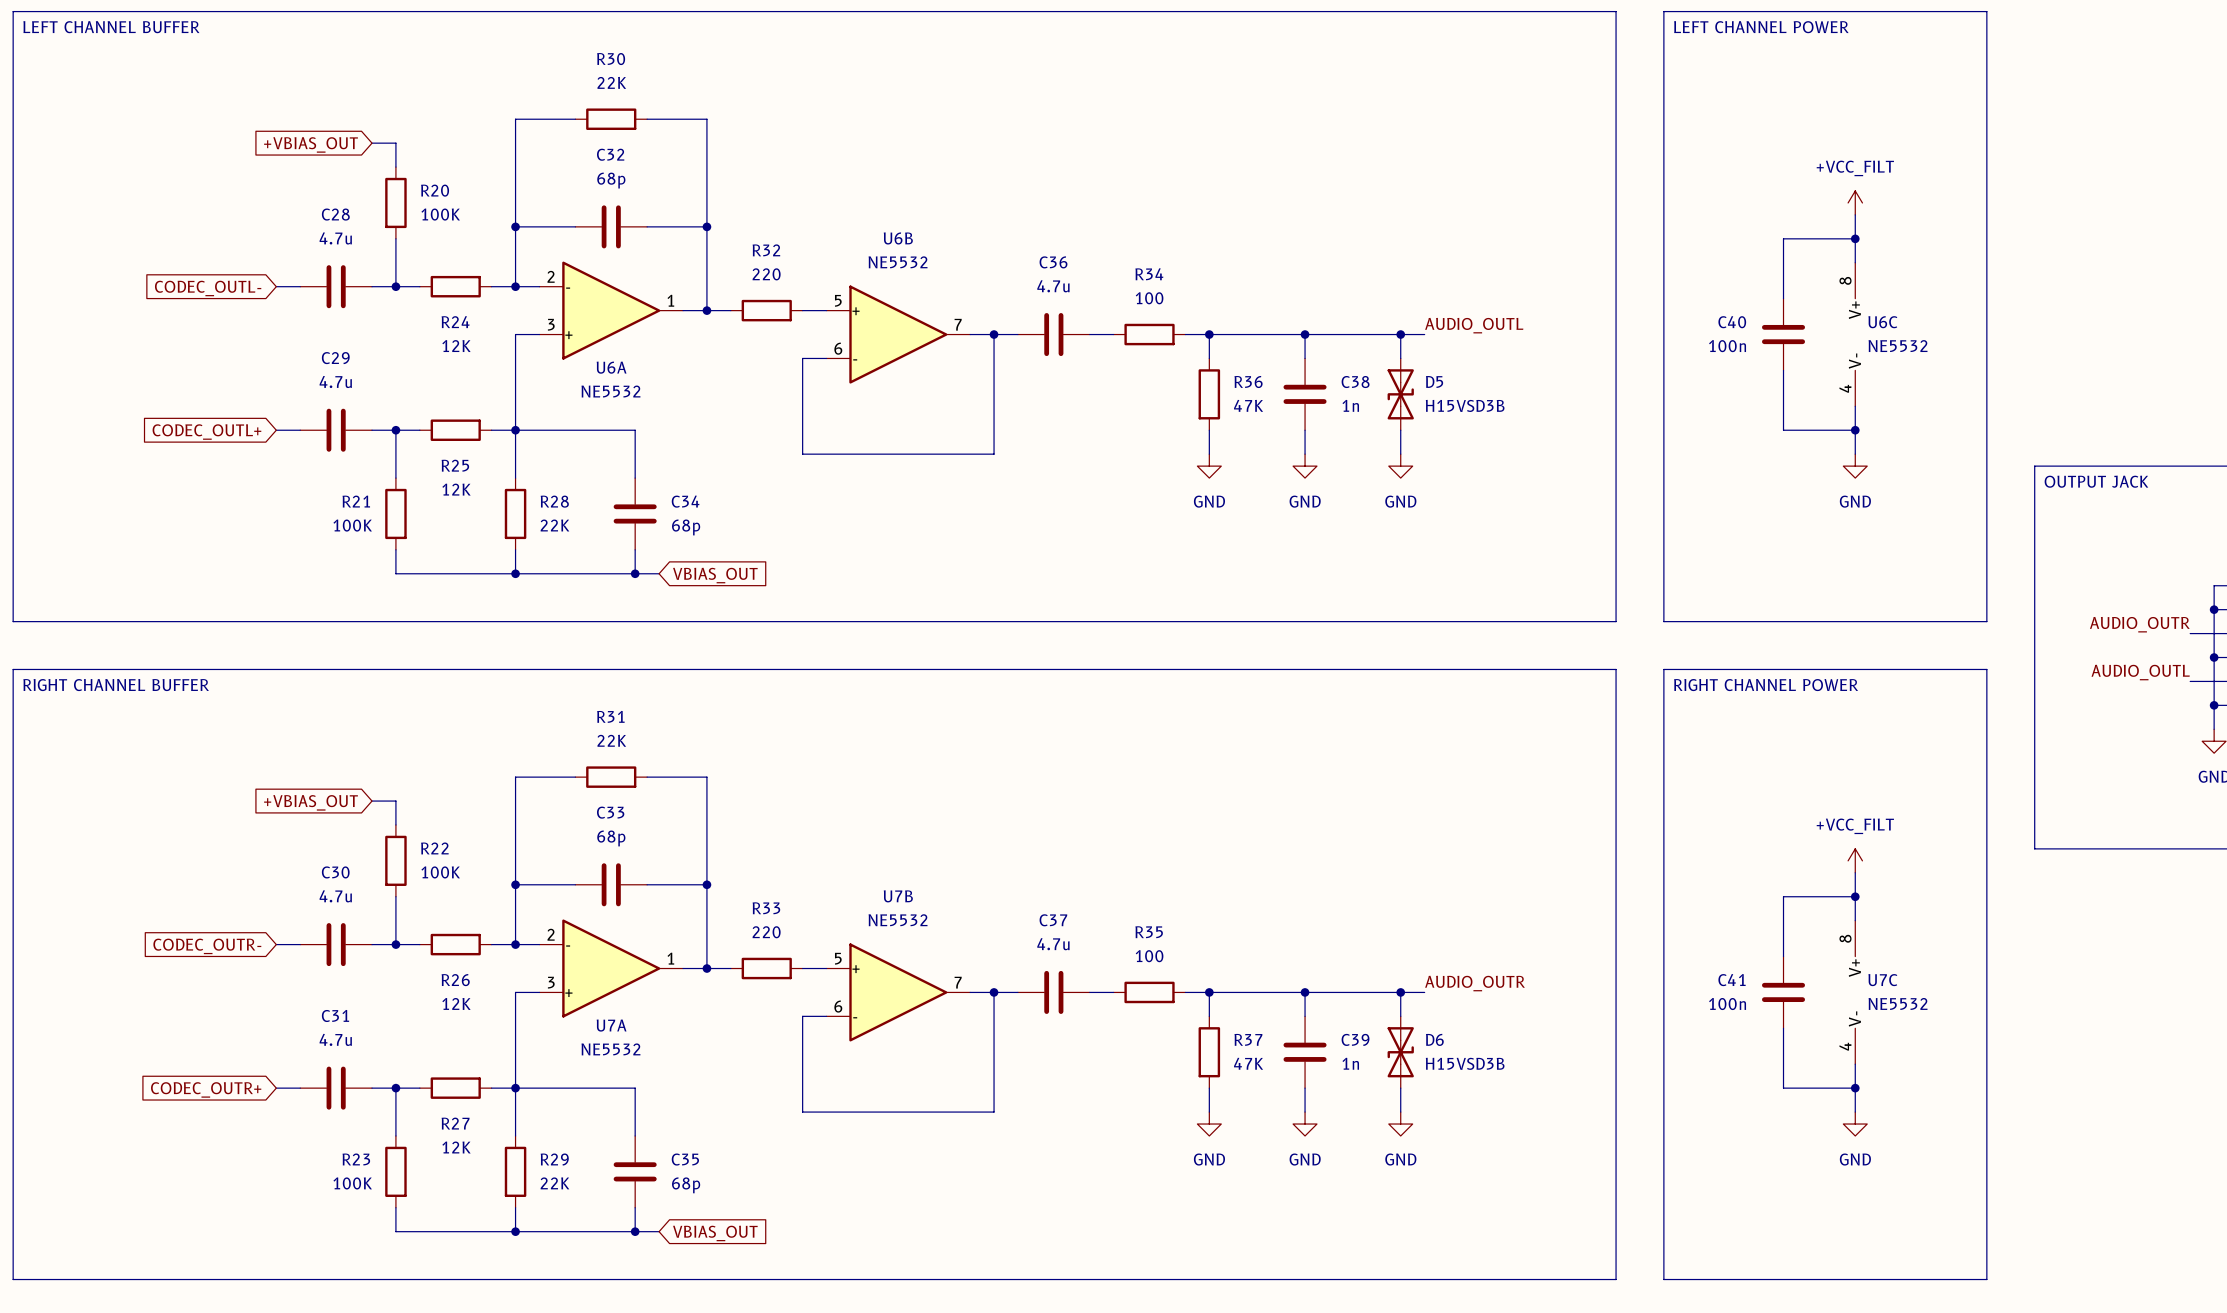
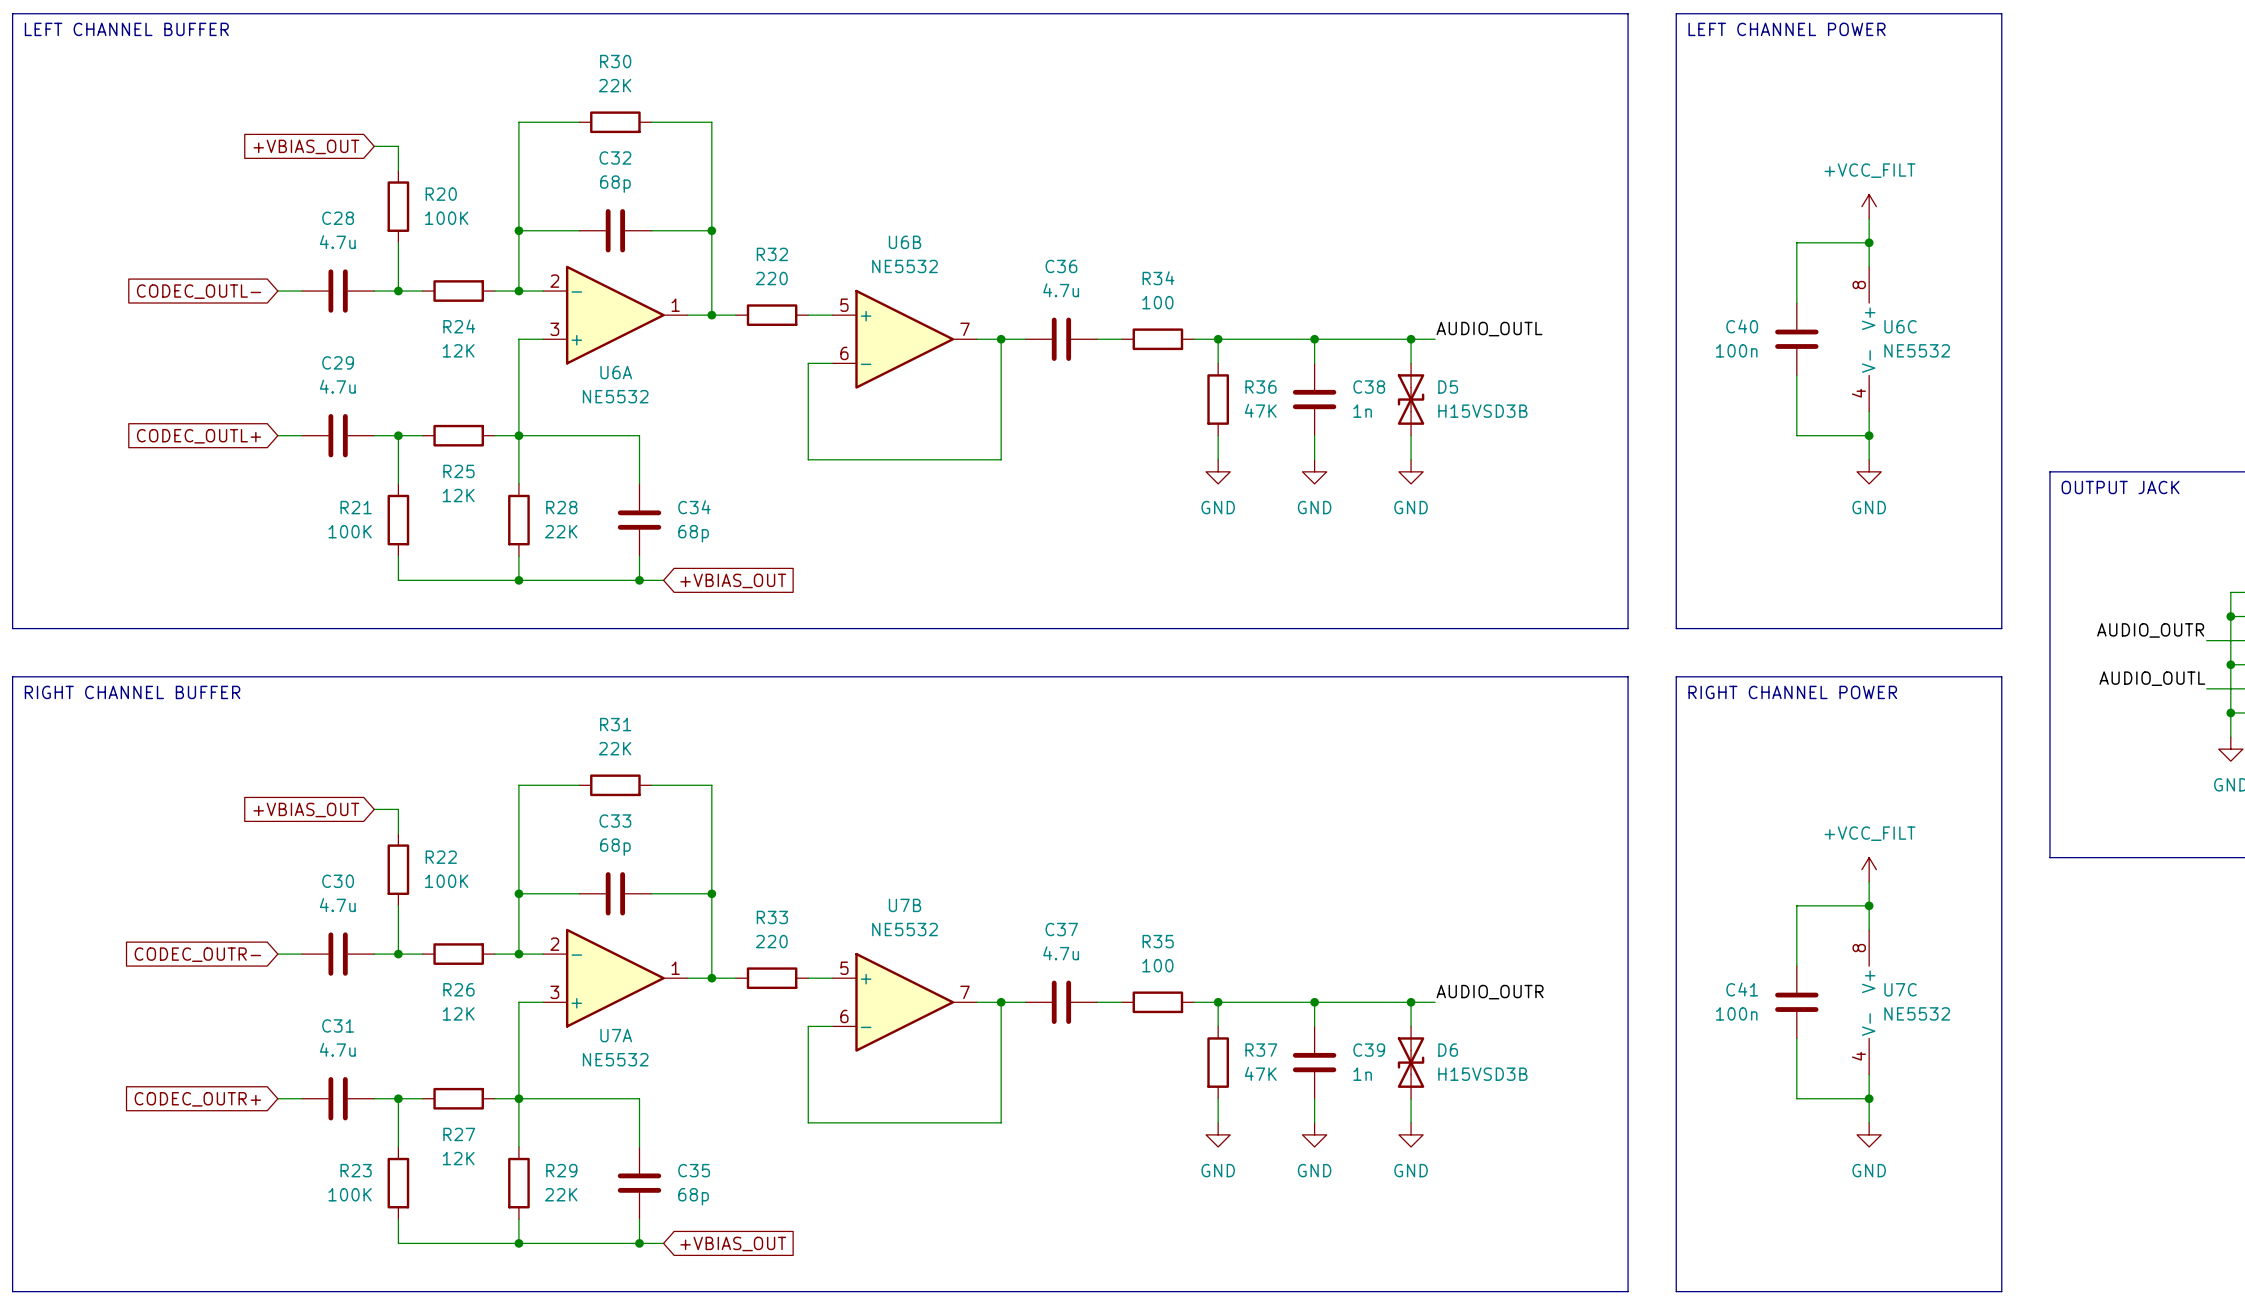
global label: VBIAS_OUT (715, 575) -> +VBIAS_OUT (733, 580)
global label: VBIAS_OUT (715, 1233) -> +VBIAS_OUT (733, 1243)

